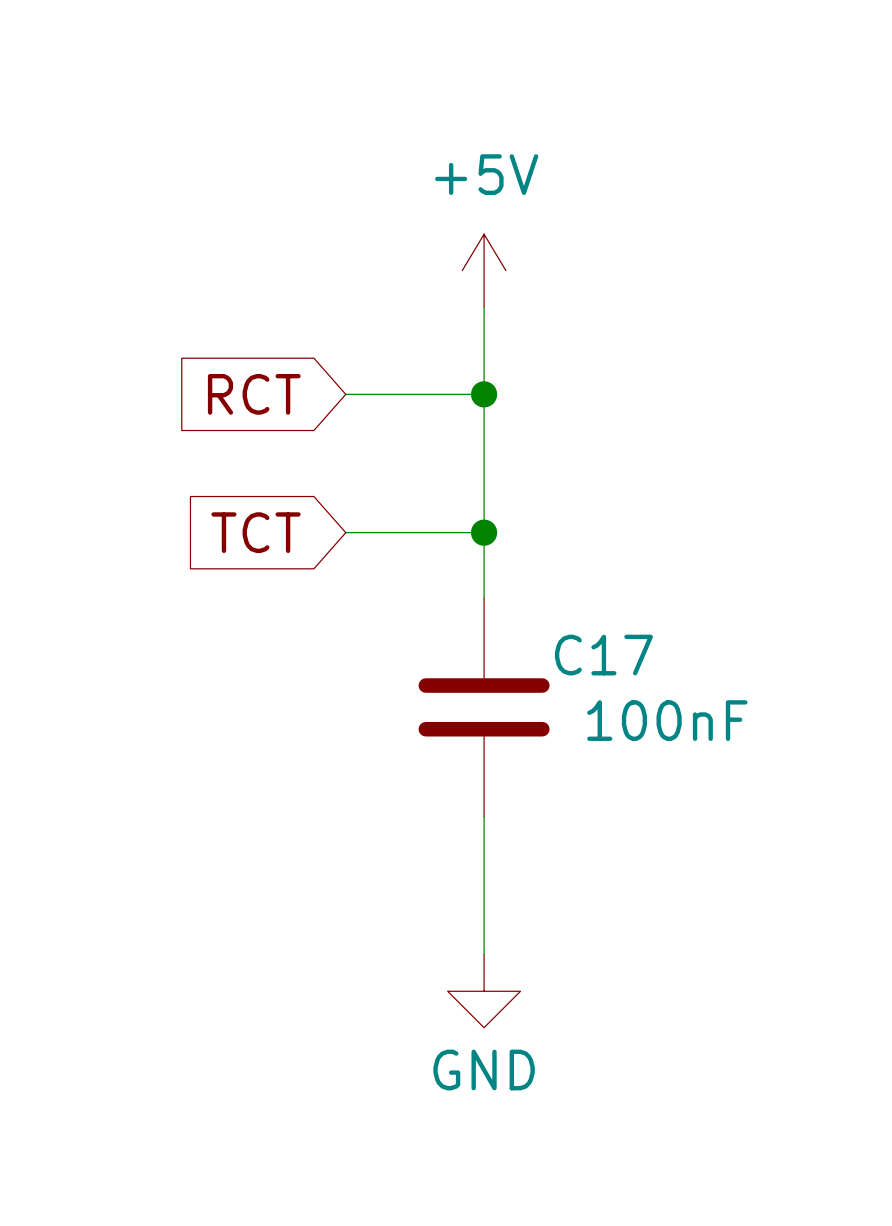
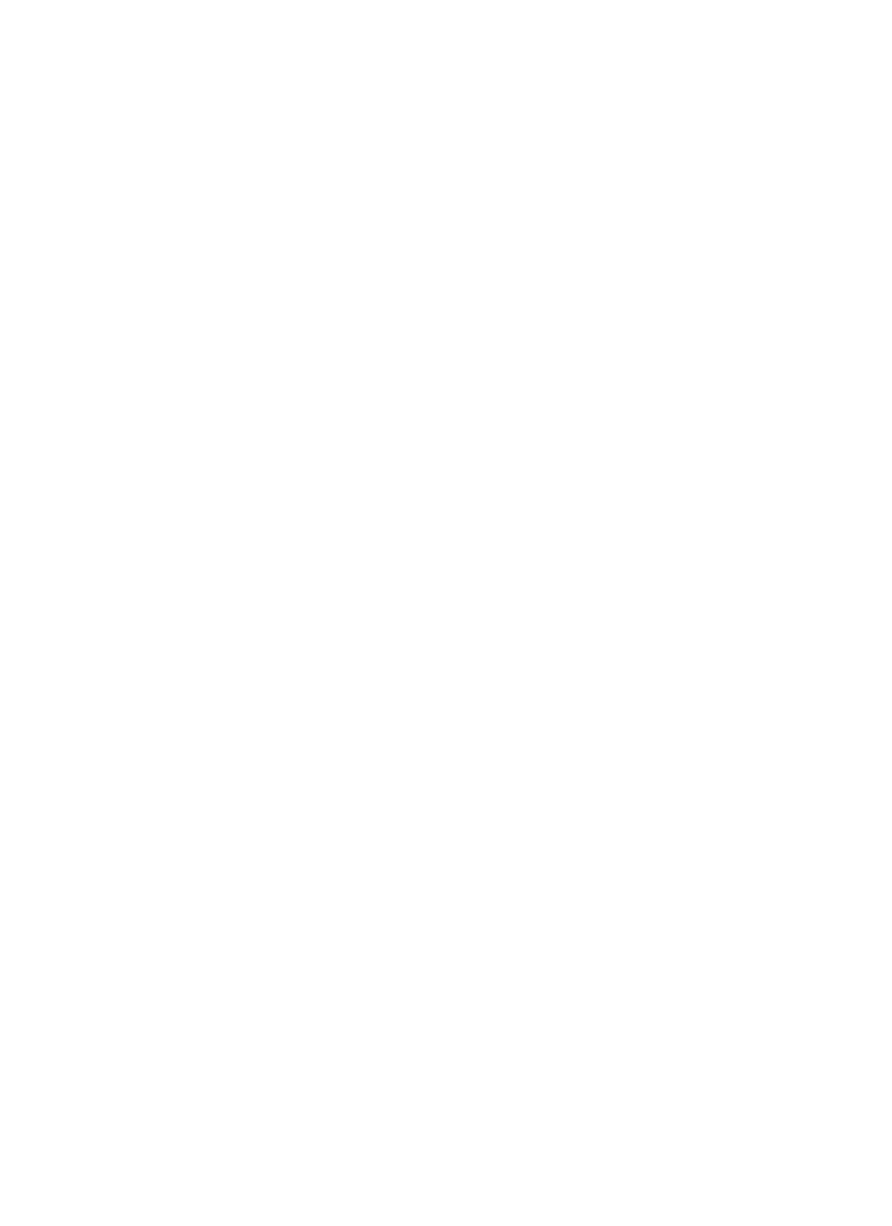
power symbol: +5V (484, 270) -> none
wire: (484, 307) (484, 598) -> none
global label: RCT (254, 394) -> none
wire: (345, 394) (484, 394) -> none
junction: (484, 394) -> none
global label: TCT (256, 532) -> none
wire: (345, 532) (484, 532) -> none
junction: (484, 532) -> none
C17: 100nF (484, 707) -> none
wire: (484, 816) (484, 954) -> none
power symbol: GND (484, 991) -> none

